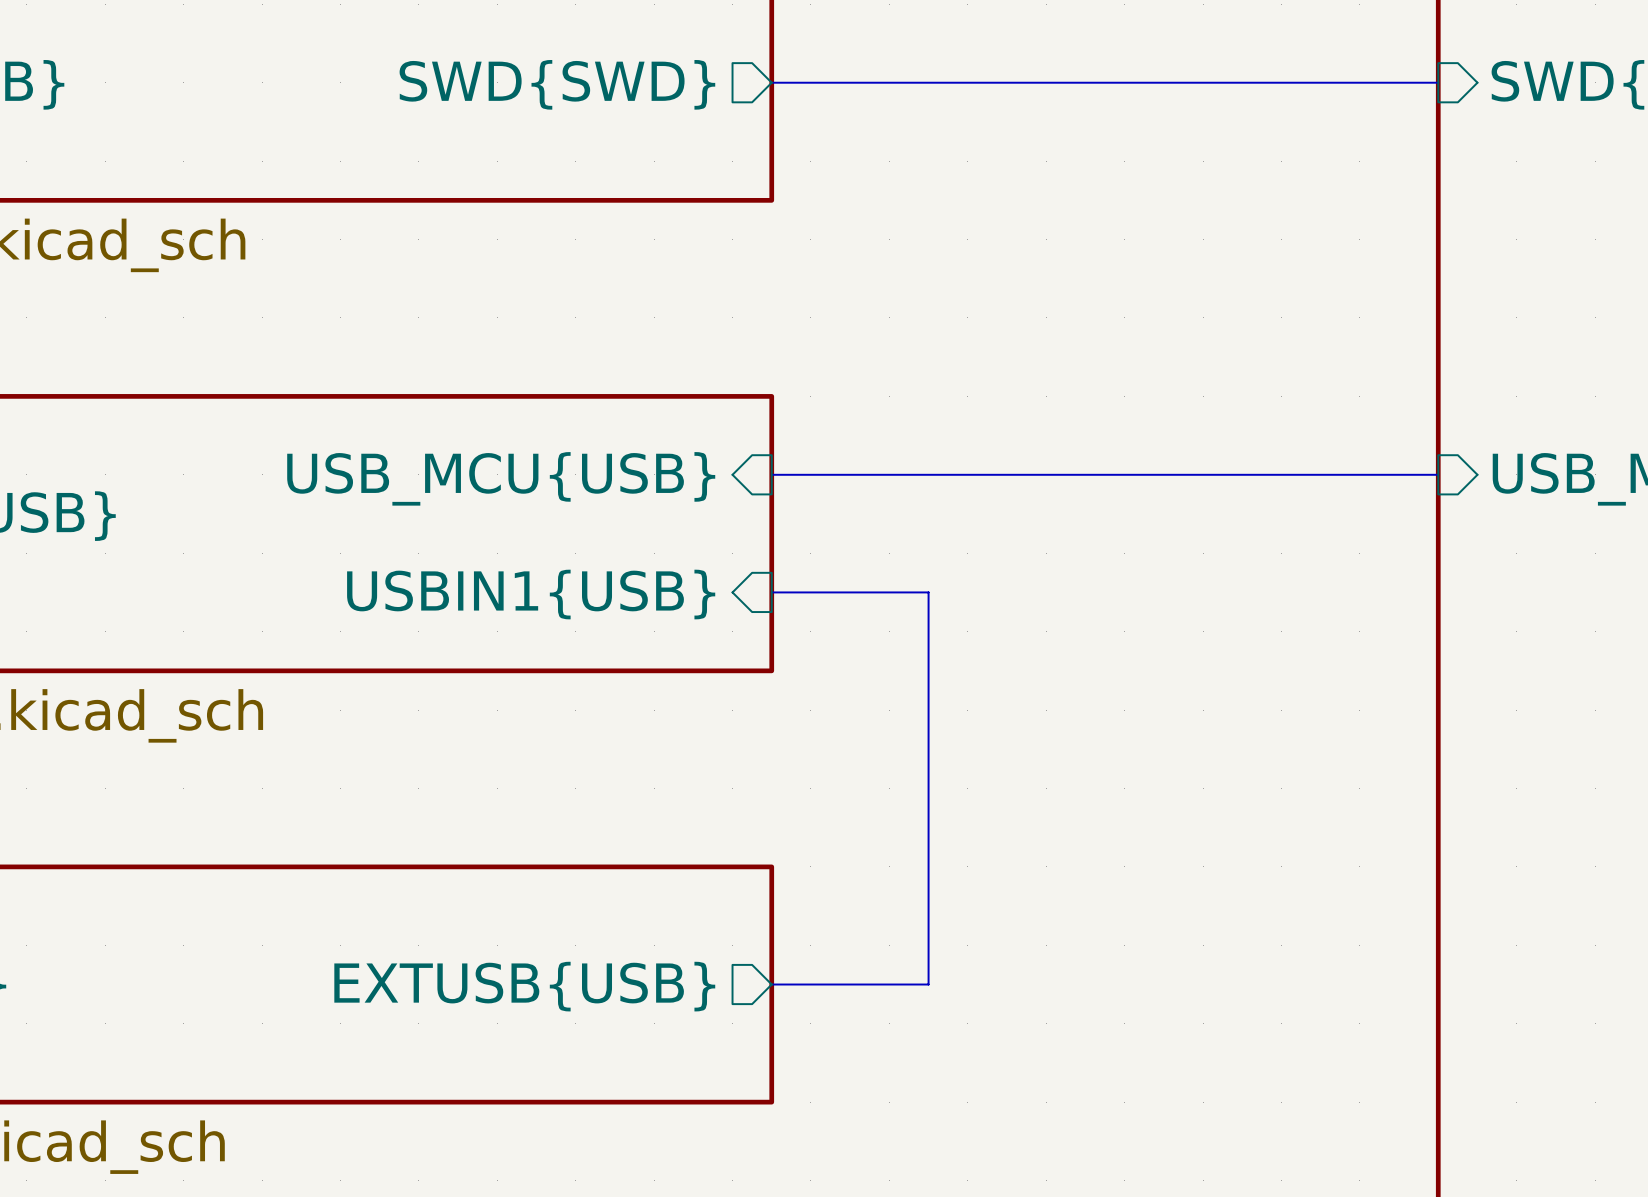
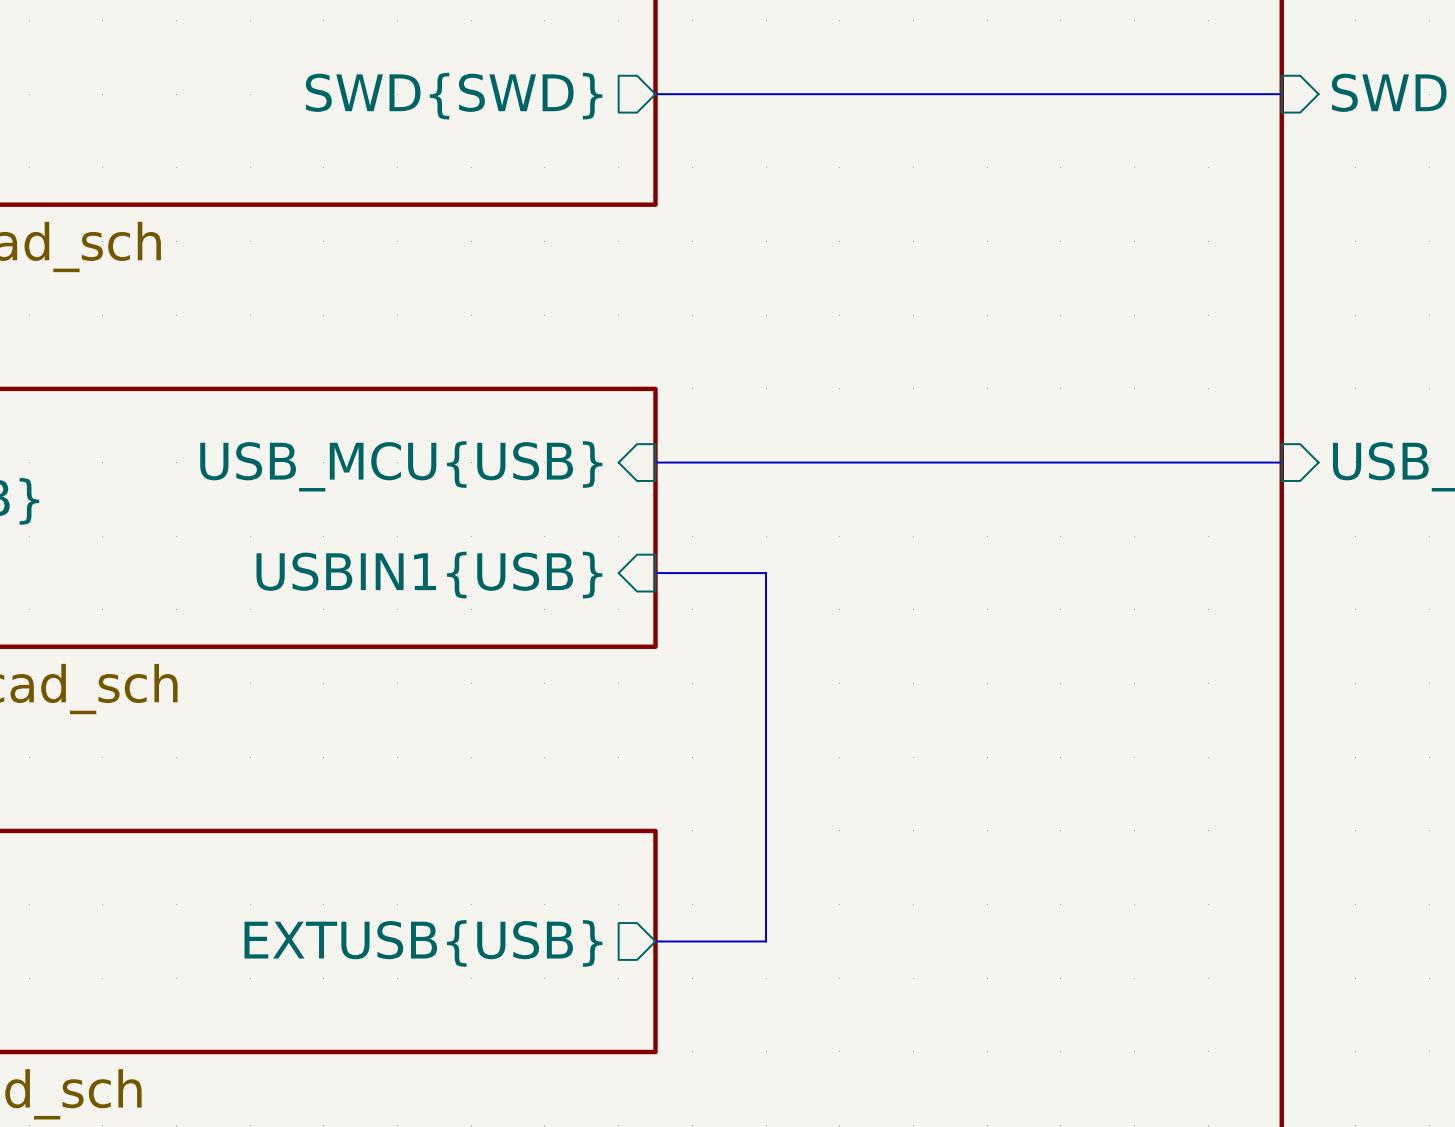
bus: (889, 592) (928, 592) (928, 984) (889, 984) -> (766, 573) (766, 941)

